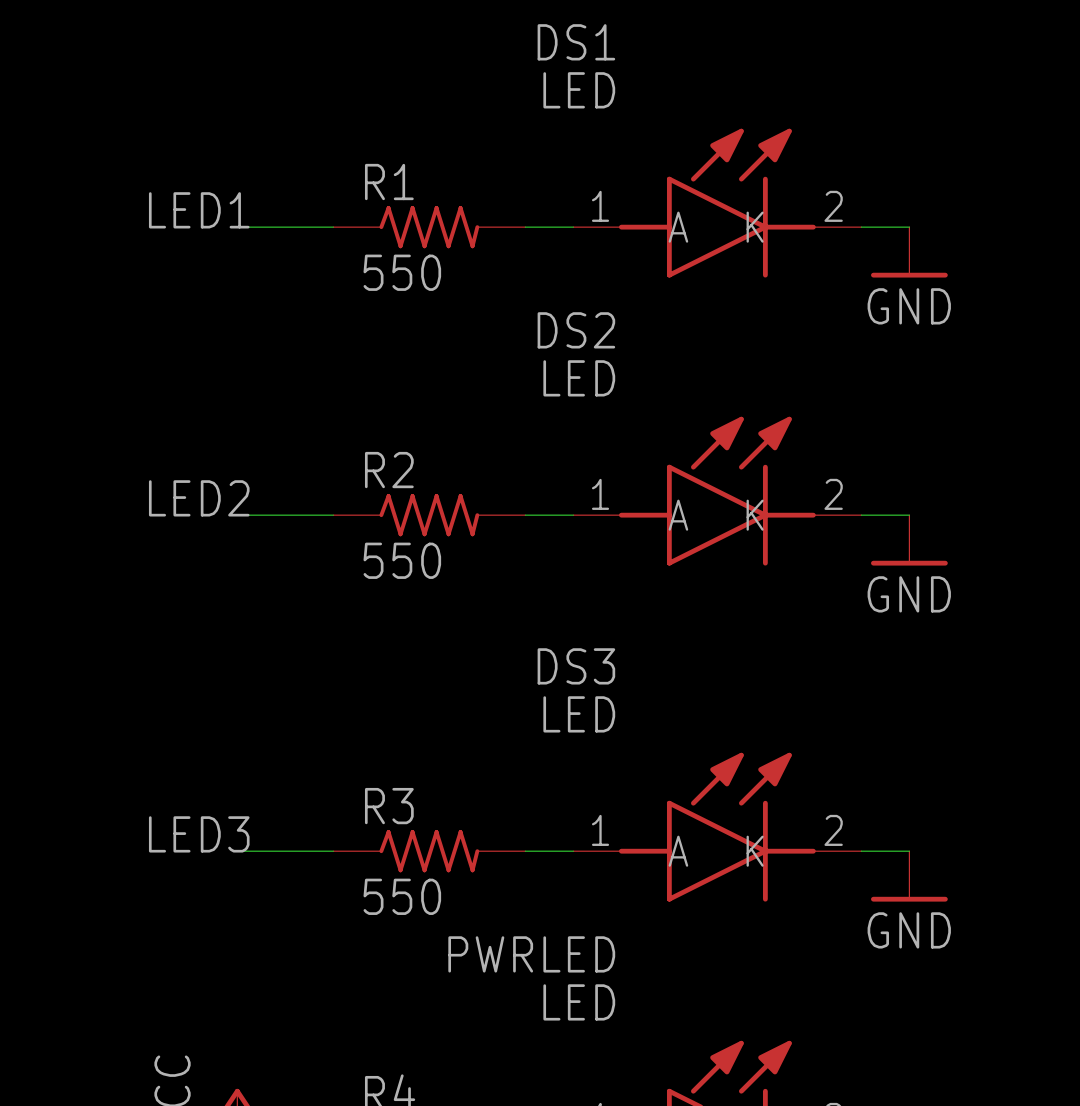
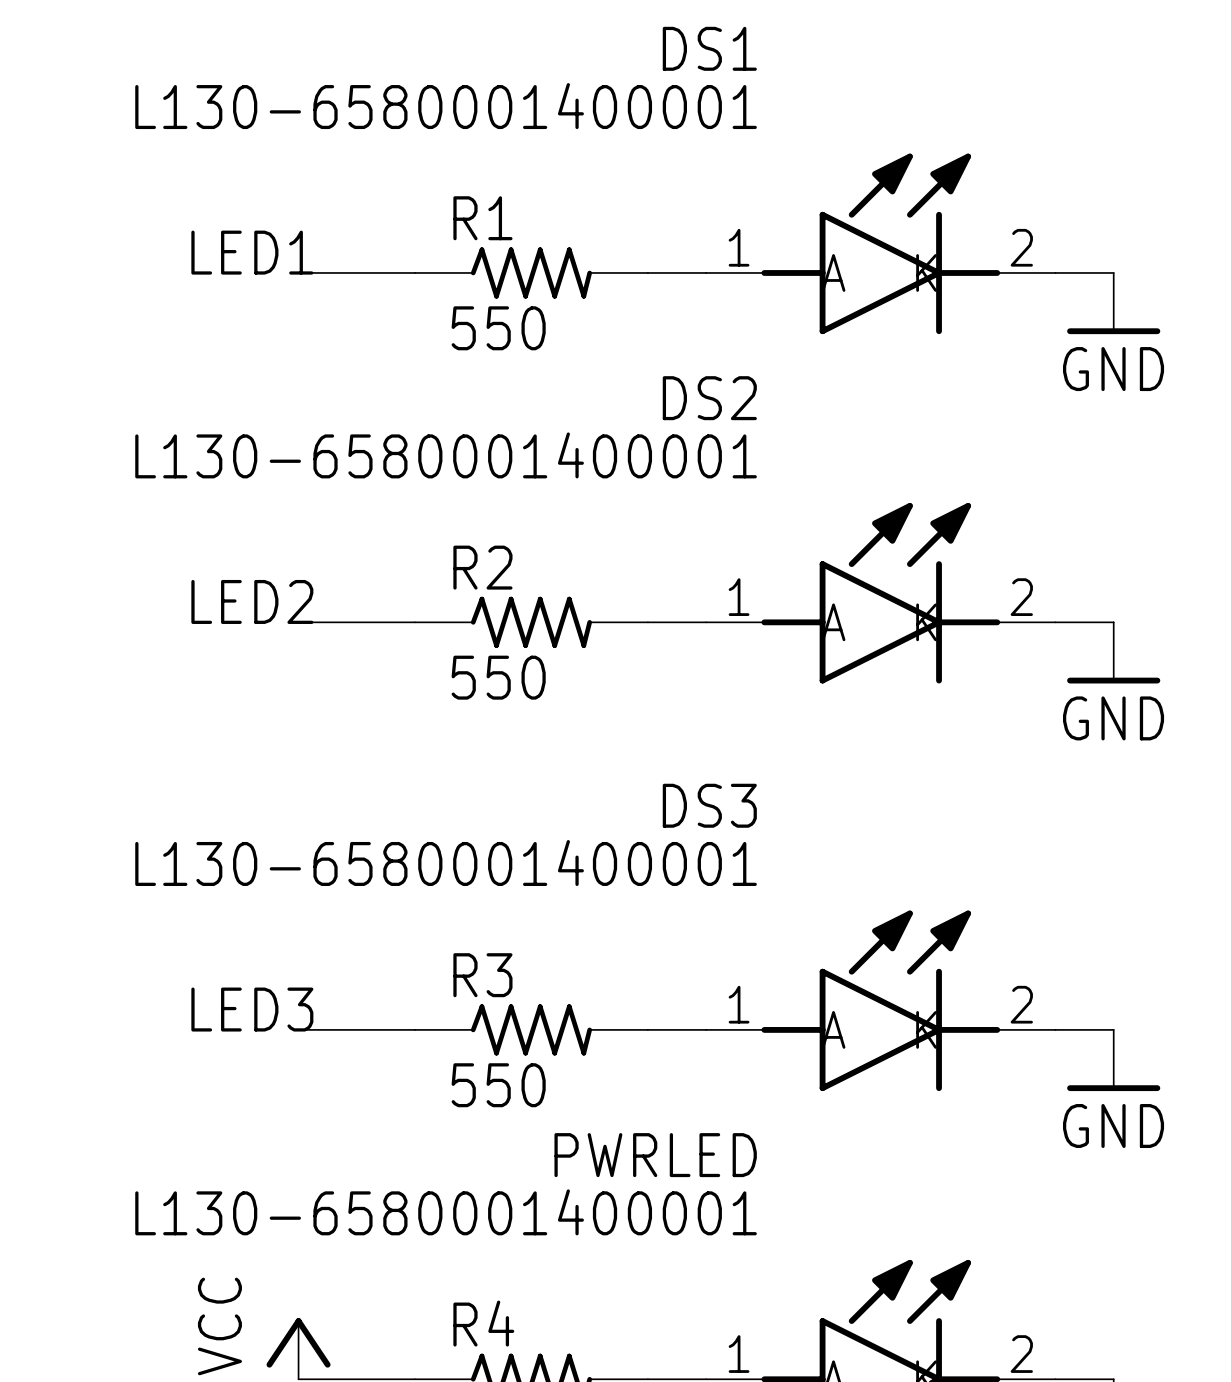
DS1 value: LED (579, 90) -> L130-6580001400001 (446, 106)
DS2 value: LED (579, 378) -> L130-6580001400001 (446, 455)
DS3 value: LED (579, 714) -> L130-6580001400001 (446, 863)
PWRLED value: LED (579, 1002) -> L130-6580001400001 (446, 1212)

